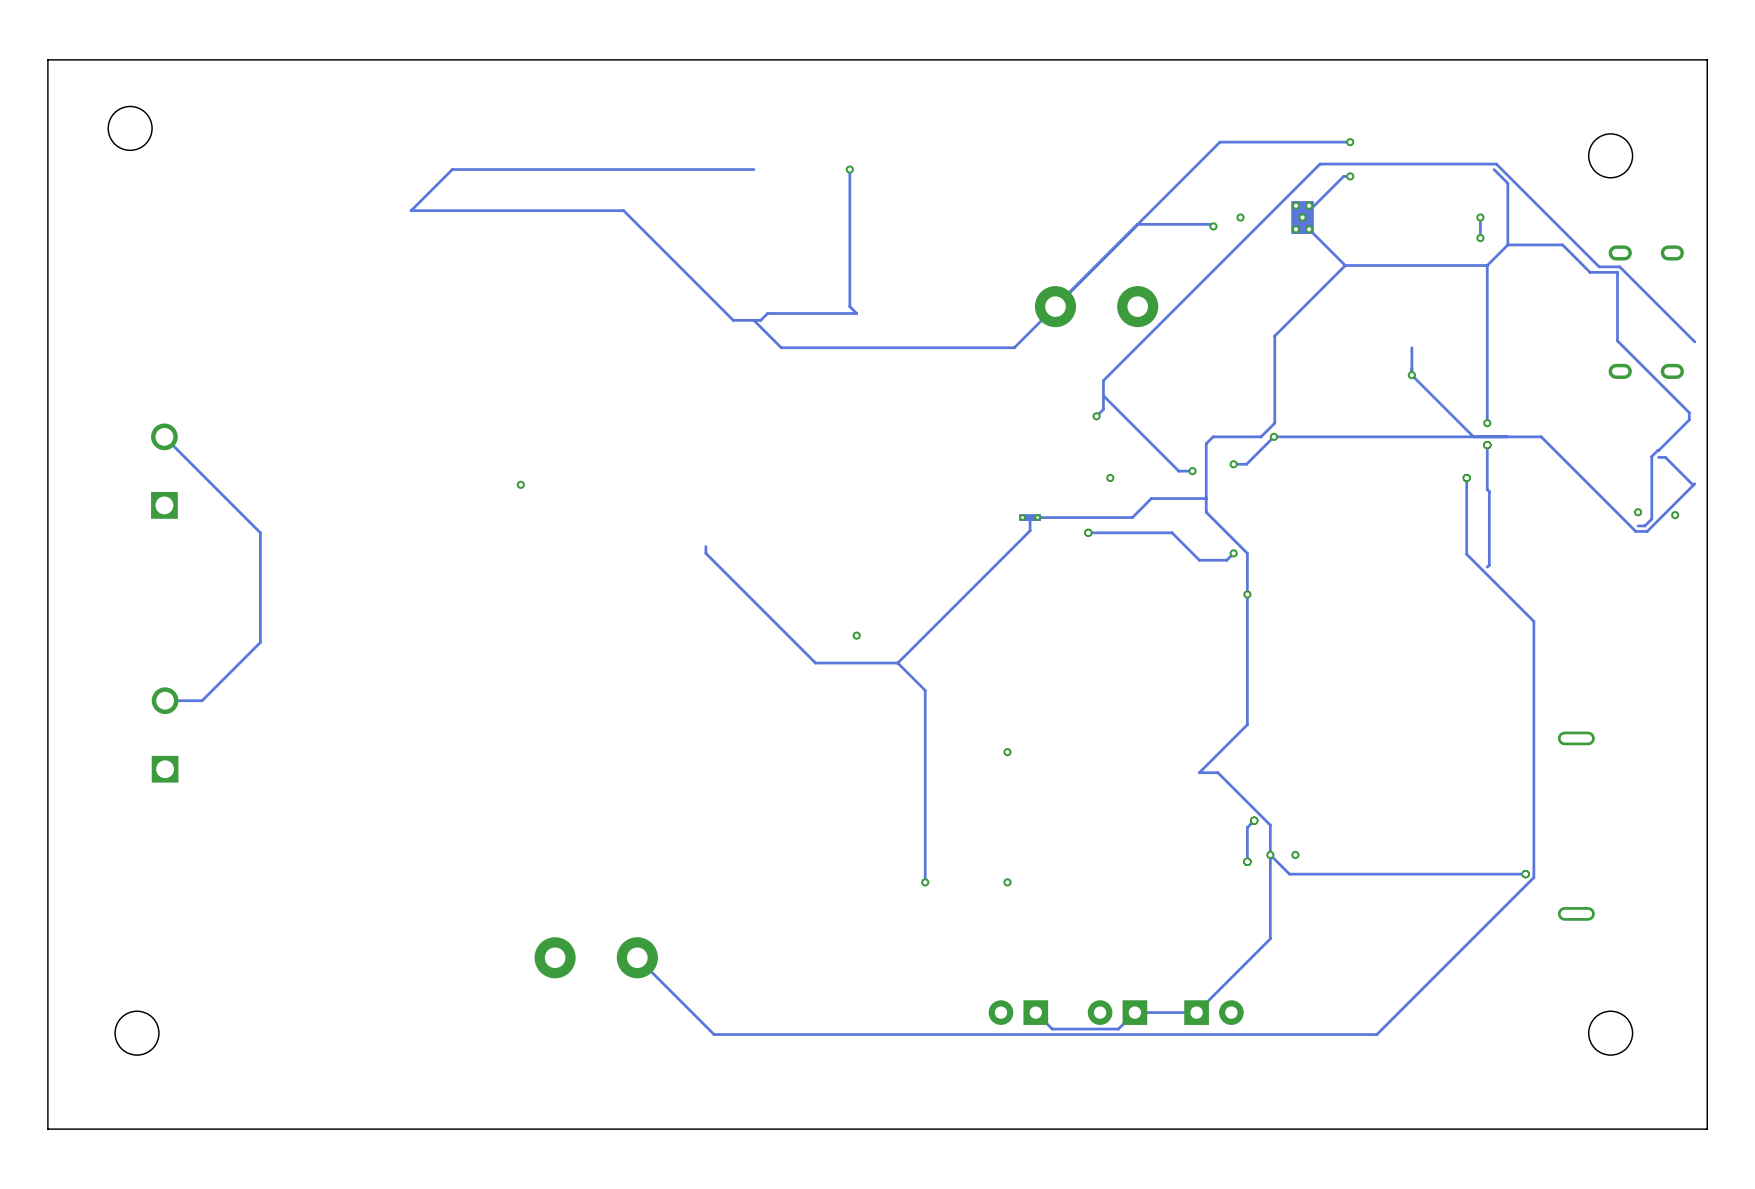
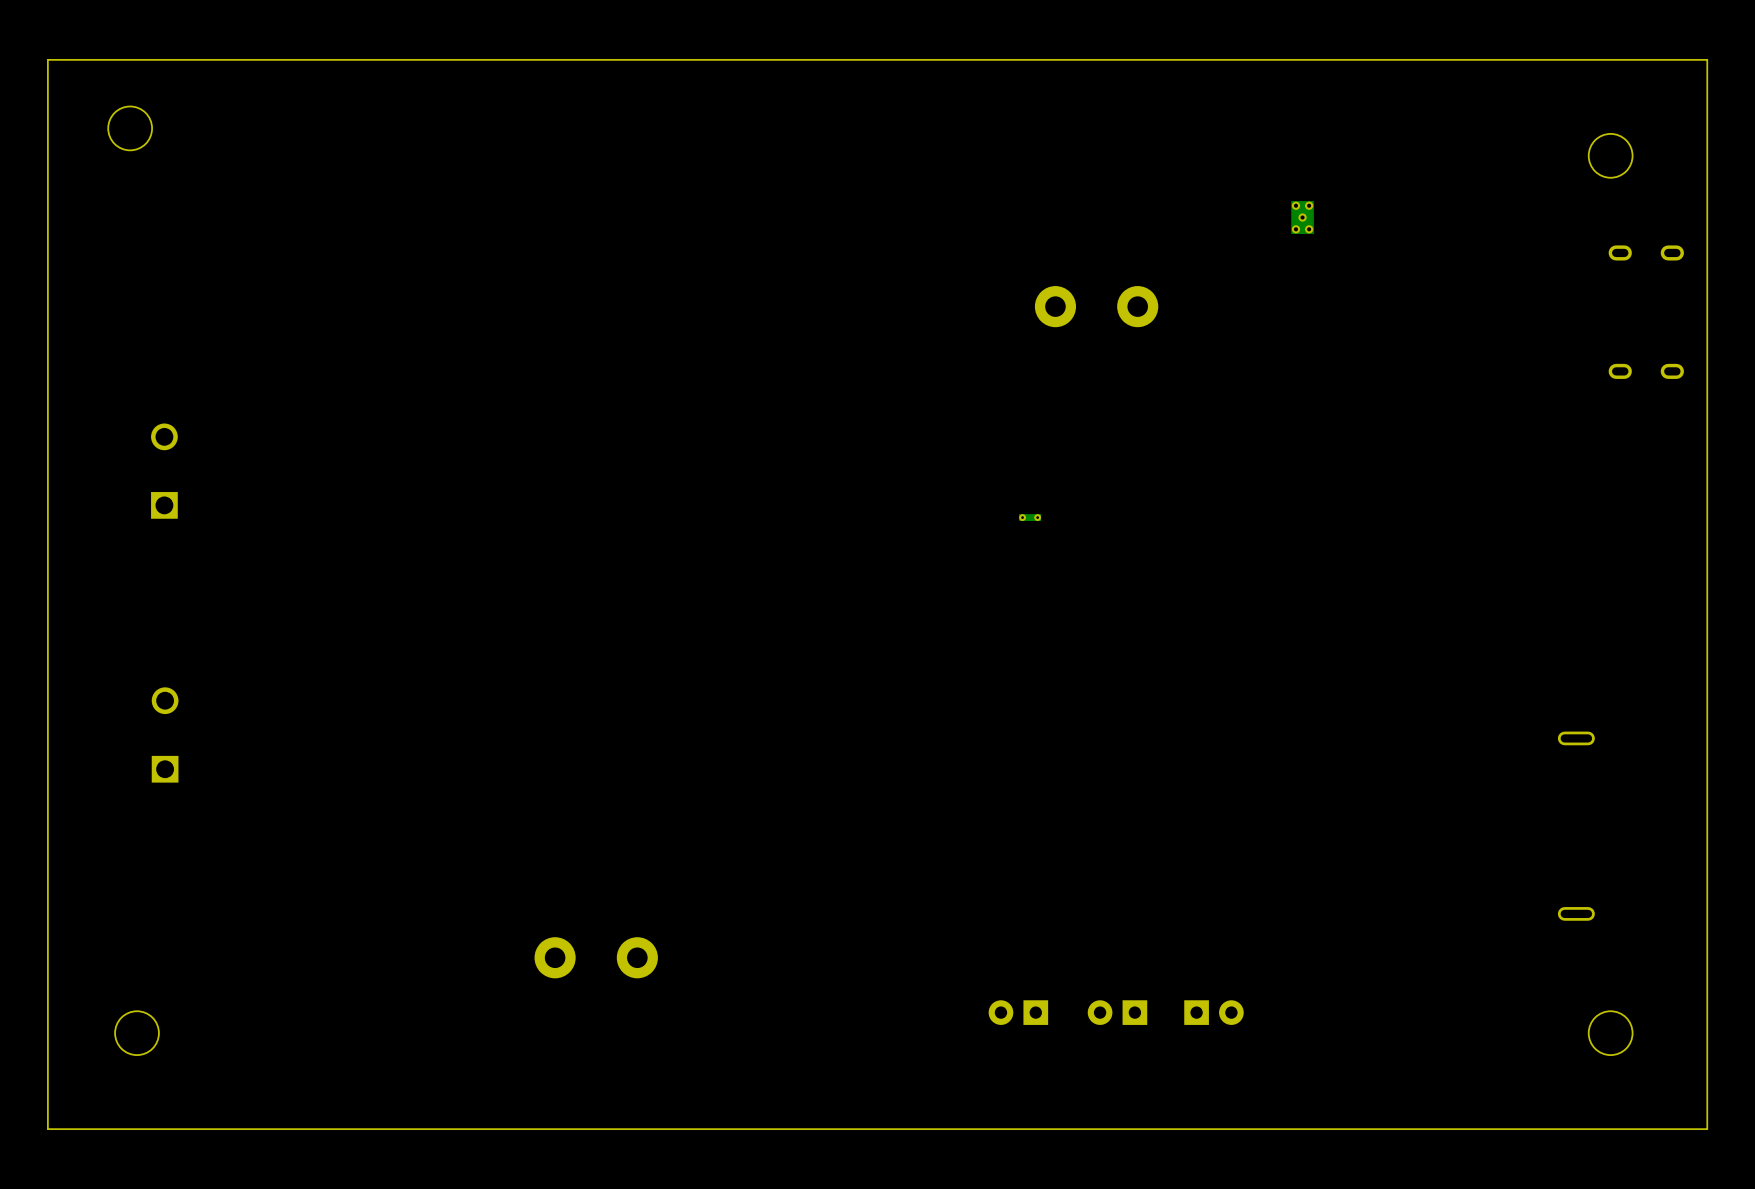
track: (1350, 142) (1219, 142) (1014, 347) (781, 347) (753, 320) -> none
via: (1350, 142) -> none
track: (849, 169) (849, 306) (856, 313) (767, 313) (760, 320) (733, 320) (623, 210) (411, 210) (452, 169) (753, 169) -> none
via: (849, 169) -> none
track: (1494, 169) (1507, 183) (1507, 244) -> none
track: (1350, 176) (1343, 176) (1302, 217) -> none
via: (1350, 176) -> none
via: (1240, 217) -> none
track: (1480, 217) (1480, 238) -> none
via: (1480, 217) -> none
track: (1137, 224) (1213, 224) (1213, 226) -> none
via: (1213, 226) -> none
track: (1309, 229) (1345, 265) -> none
via: (1480, 238) -> none
track: (1507, 244) (1487, 265) -> none
track: (1507, 244) (1562, 244) (1590, 272) (1617, 272) (1617, 340) (1689, 412) (1689, 419) (1651, 456) (1651, 519) (1644, 525) (1638, 525) -> none
track: (1345, 265) (1274, 336) (1274, 423) (1261, 436) (1213, 436) (1206, 443) (1206, 512) (1247, 553) (1247, 724) (1199, 772) (1217, 772) (1270, 825) (1270, 938) (1196, 1012) (1134, 1012) (1118, 1029) (1052, 1029) (1035, 1012) -> none
track: (1487, 265) (1345, 265) -> none
track: (1487, 265) (1487, 423) -> none
track: (1694, 341) (1619, 266) (1599, 266) (1496, 164) (1320, 164) (1103, 380) (1103, 409) (1096, 416) -> none
track: (1411, 347) (1411, 375) (1473, 436) -> none
via: (1411, 375) -> none
track: (1103, 395) (1178, 471) (1192, 471) -> none
via: (1096, 416) -> none
via: (1487, 423) -> none
track: (164, 436) (260, 532) (260, 642) (202, 700) (165, 700) -> none
via: (1273, 436) -> none
track: (1487, 445) (1487, 489) (1489, 491) (1489, 565) (1487, 567) -> none
via: (1487, 445) -> none
track: (1658, 457) (1665, 457) (1693, 485) -> none
track: (1233, 464) (1246, 464) (1273, 436) (1541, 436) (1635, 531) (1647, 531) (1694, 483) -> none
via: (1233, 464) -> none
via: (1192, 471) -> none
via: (1110, 477) -> none
track: (1466, 477) (1466, 554) (1533, 621) (1533, 877) (1376, 1034) (714, 1034) (637, 957) -> none
via: (1466, 477) -> none
via: (520, 484) -> none
track: (1206, 498) (1151, 498) (1132, 517) (1030, 517) (1030, 530) (897, 663) -> none
via: (1638, 512) -> none
via: (1675, 515) -> none
track: (1088, 532) (1171, 532) (1199, 560) (1226, 560) (1233, 553) -> none
via: (1088, 532) -> none
track: (705, 546) (705, 553) (815, 663) (897, 663) -> none
via: (1233, 553) -> none
via: (1247, 594) -> none
via: (856, 635) -> none
track: (897, 663) (925, 690) (925, 882) -> none
via: (1007, 752) -> none
track: (1254, 820) (1247, 827) (1247, 861) -> none
via: (1254, 820) -> none
track: (1270, 854) (1289, 874) (1525, 874) -> none
via: (1270, 854) -> none
via: (1295, 854) -> none
via: (1247, 861) -> none
via: (1525, 874) -> none
via: (925, 882) -> none
via: (1007, 882) -> none

